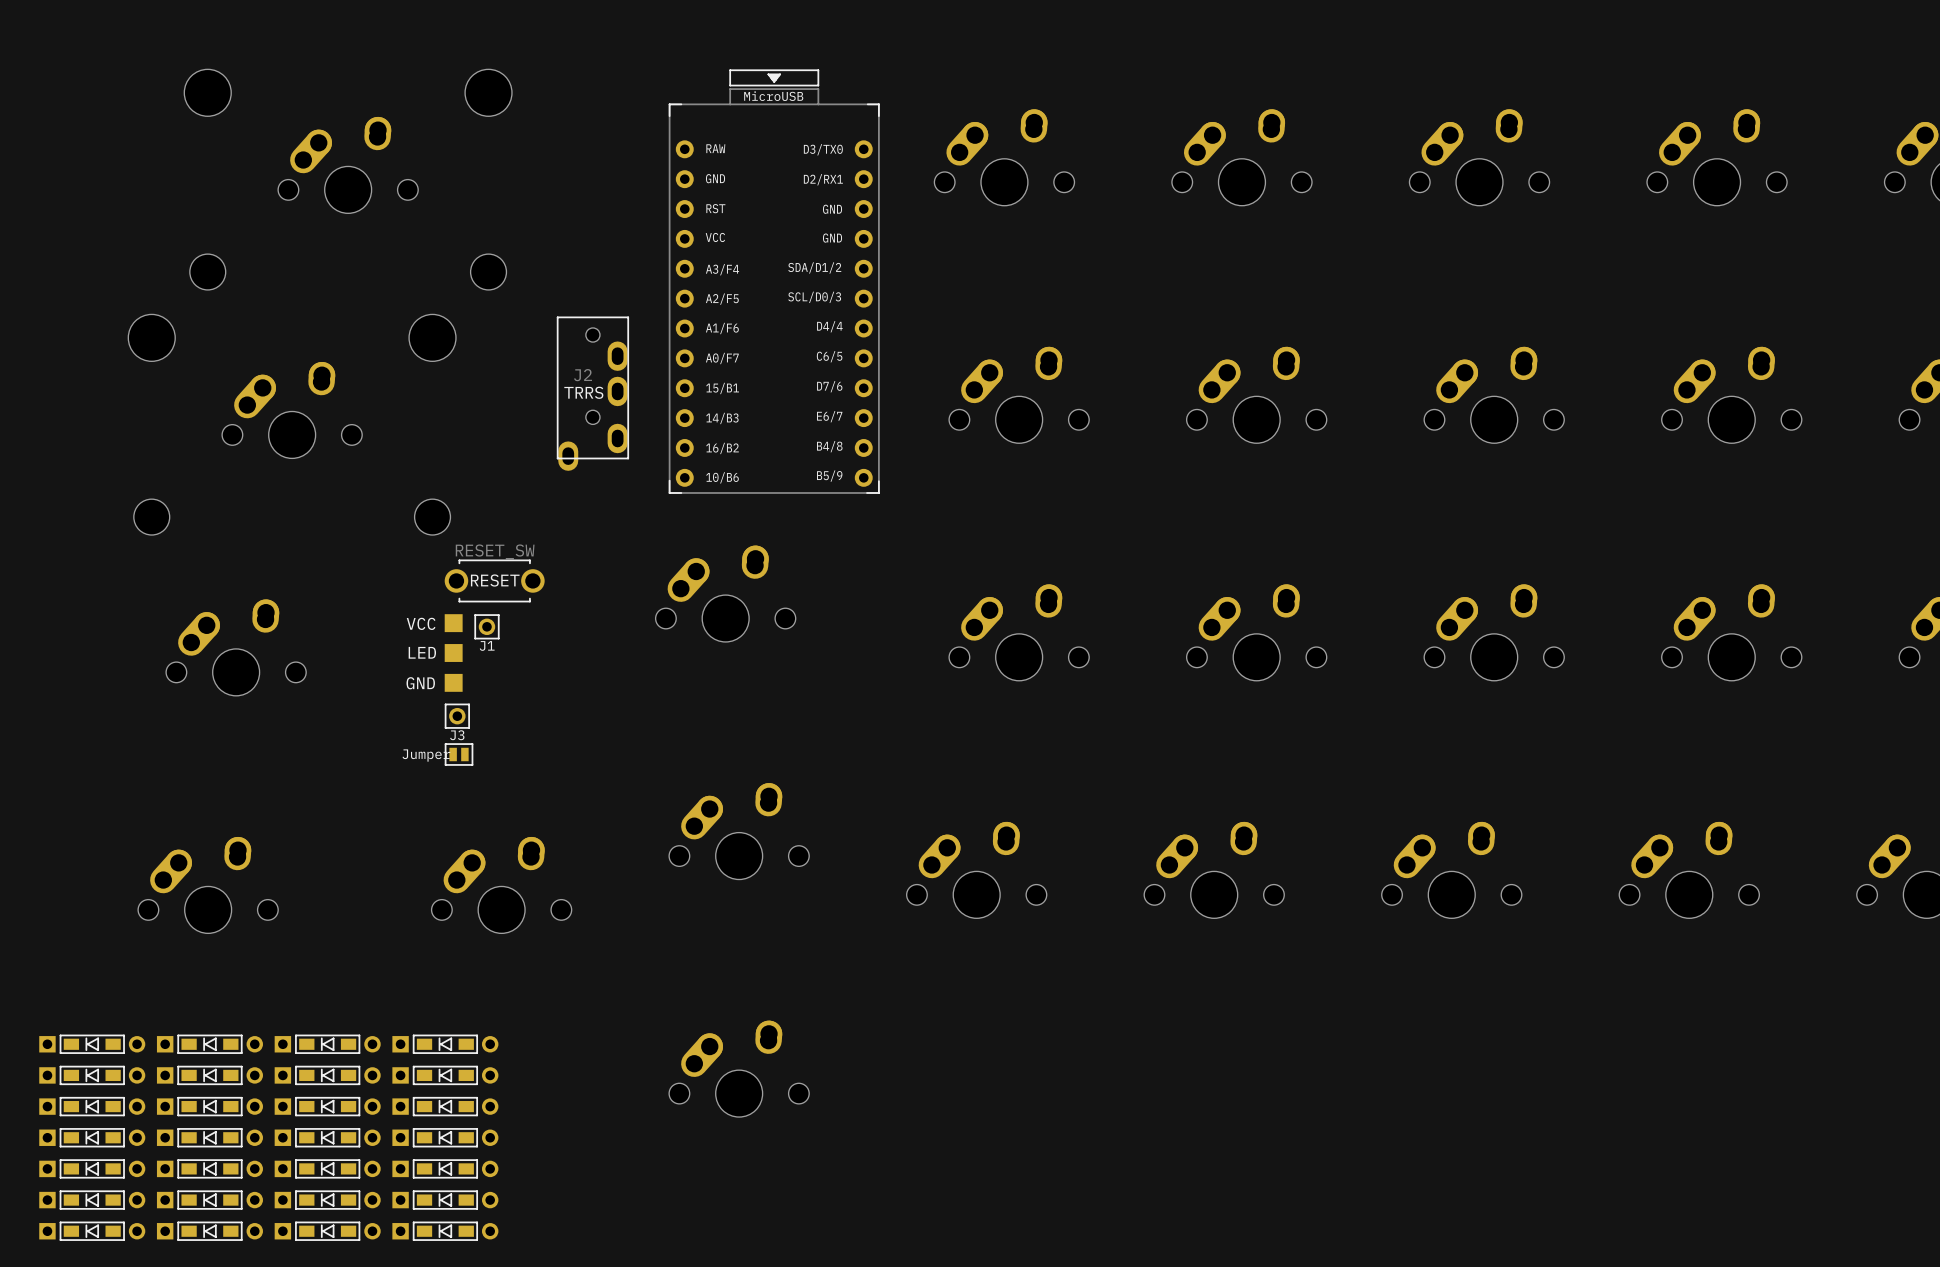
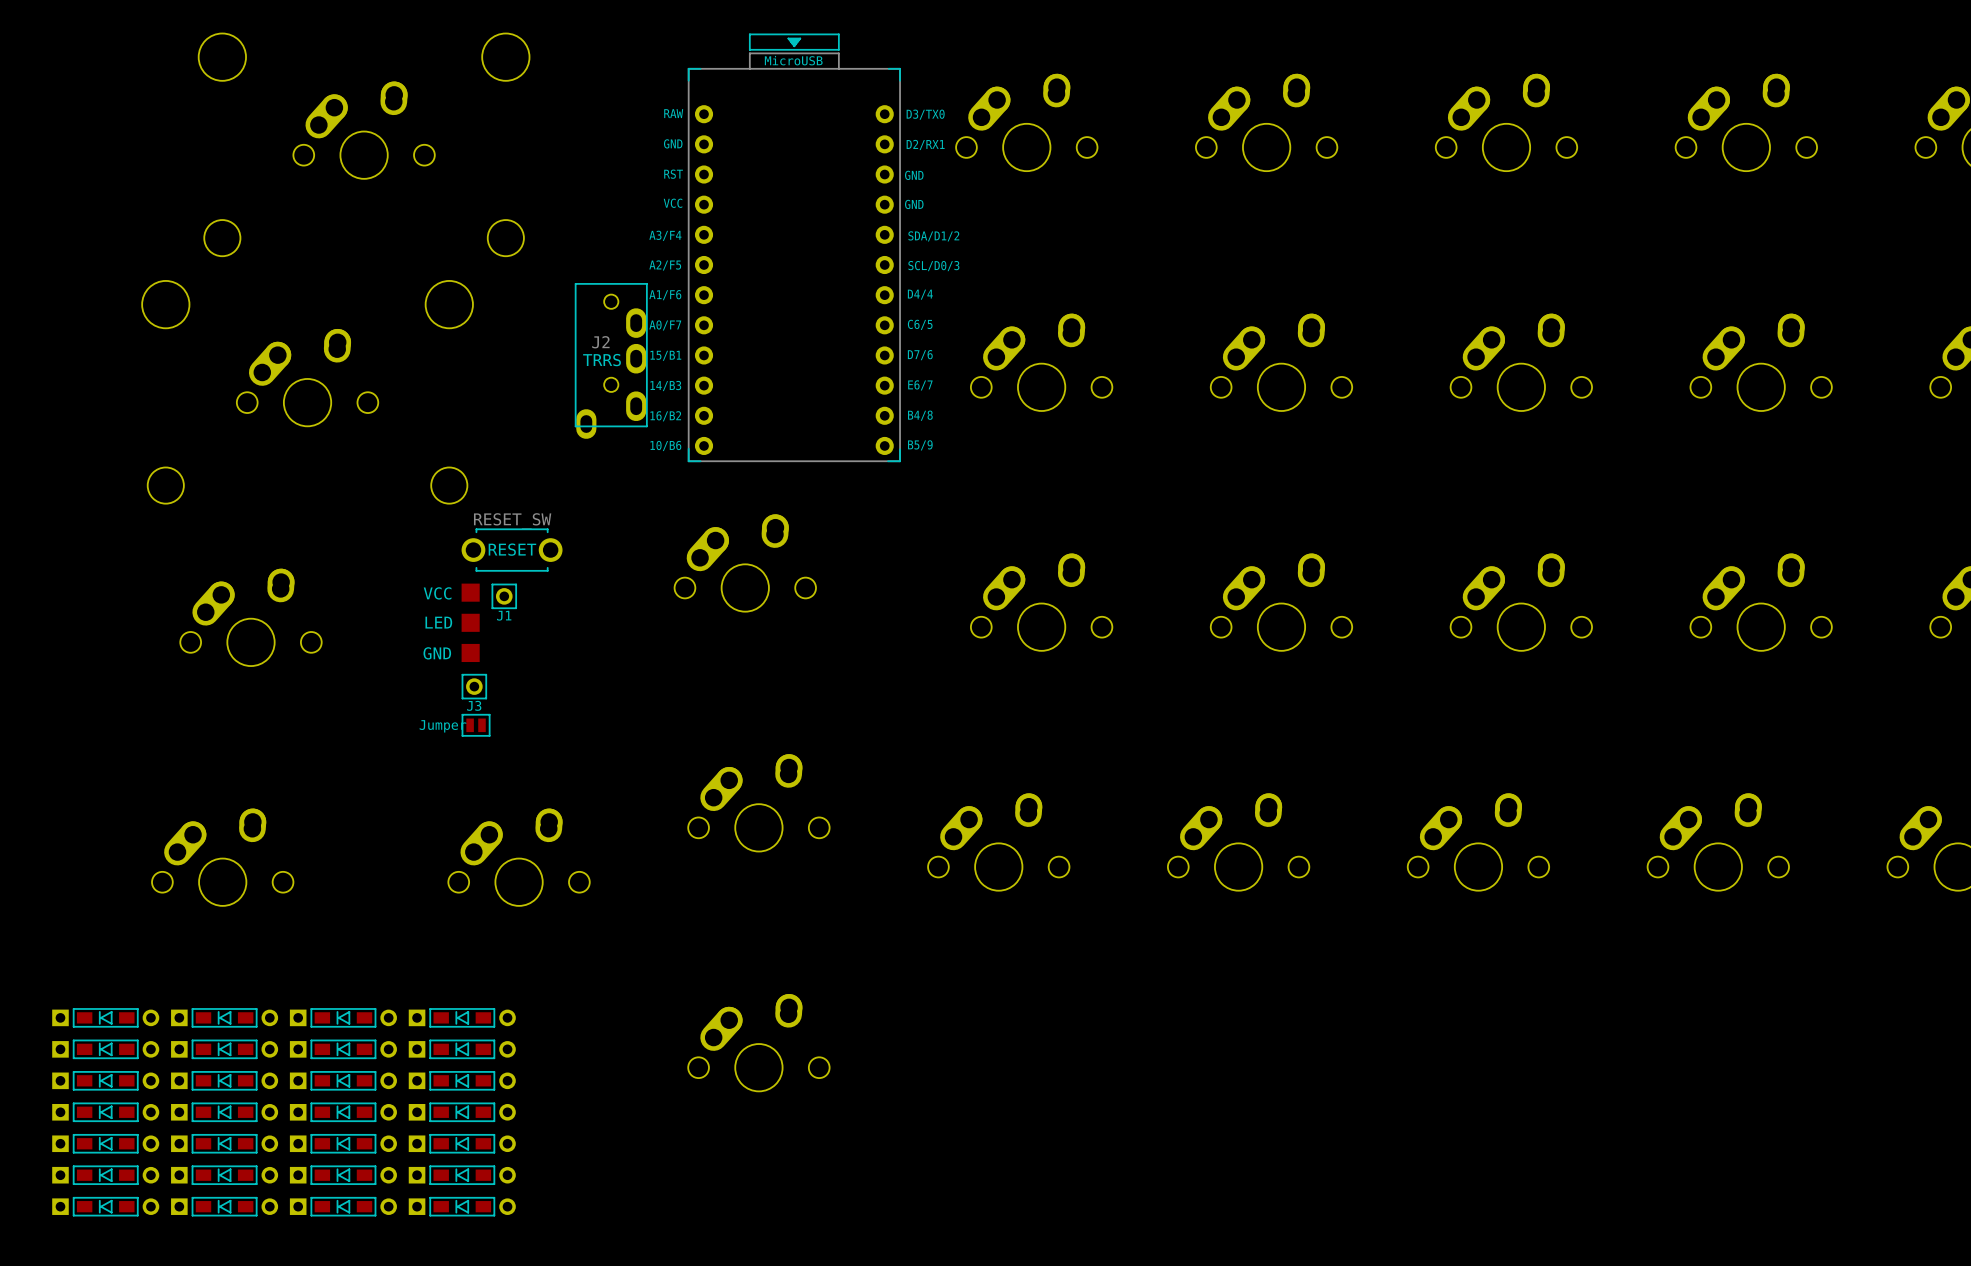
part footprint: [668, 69, 880, 494] -> [687, 33, 901, 463]

